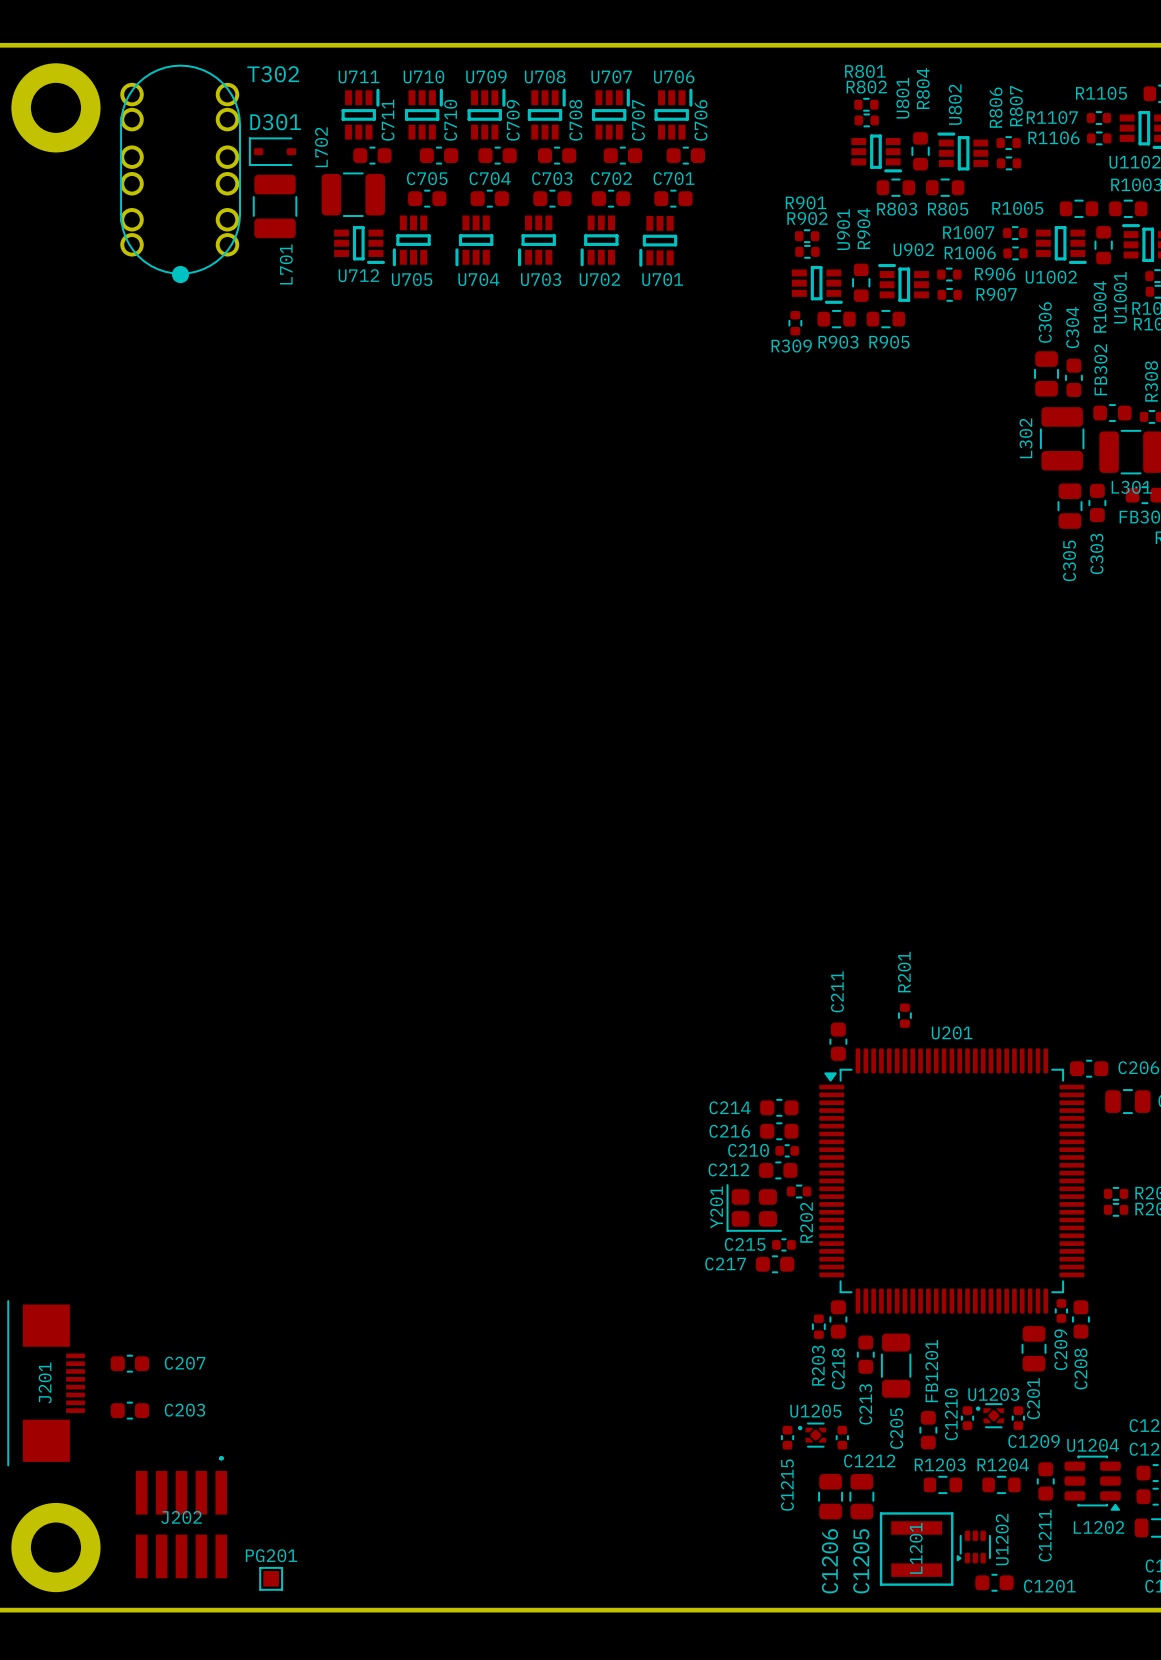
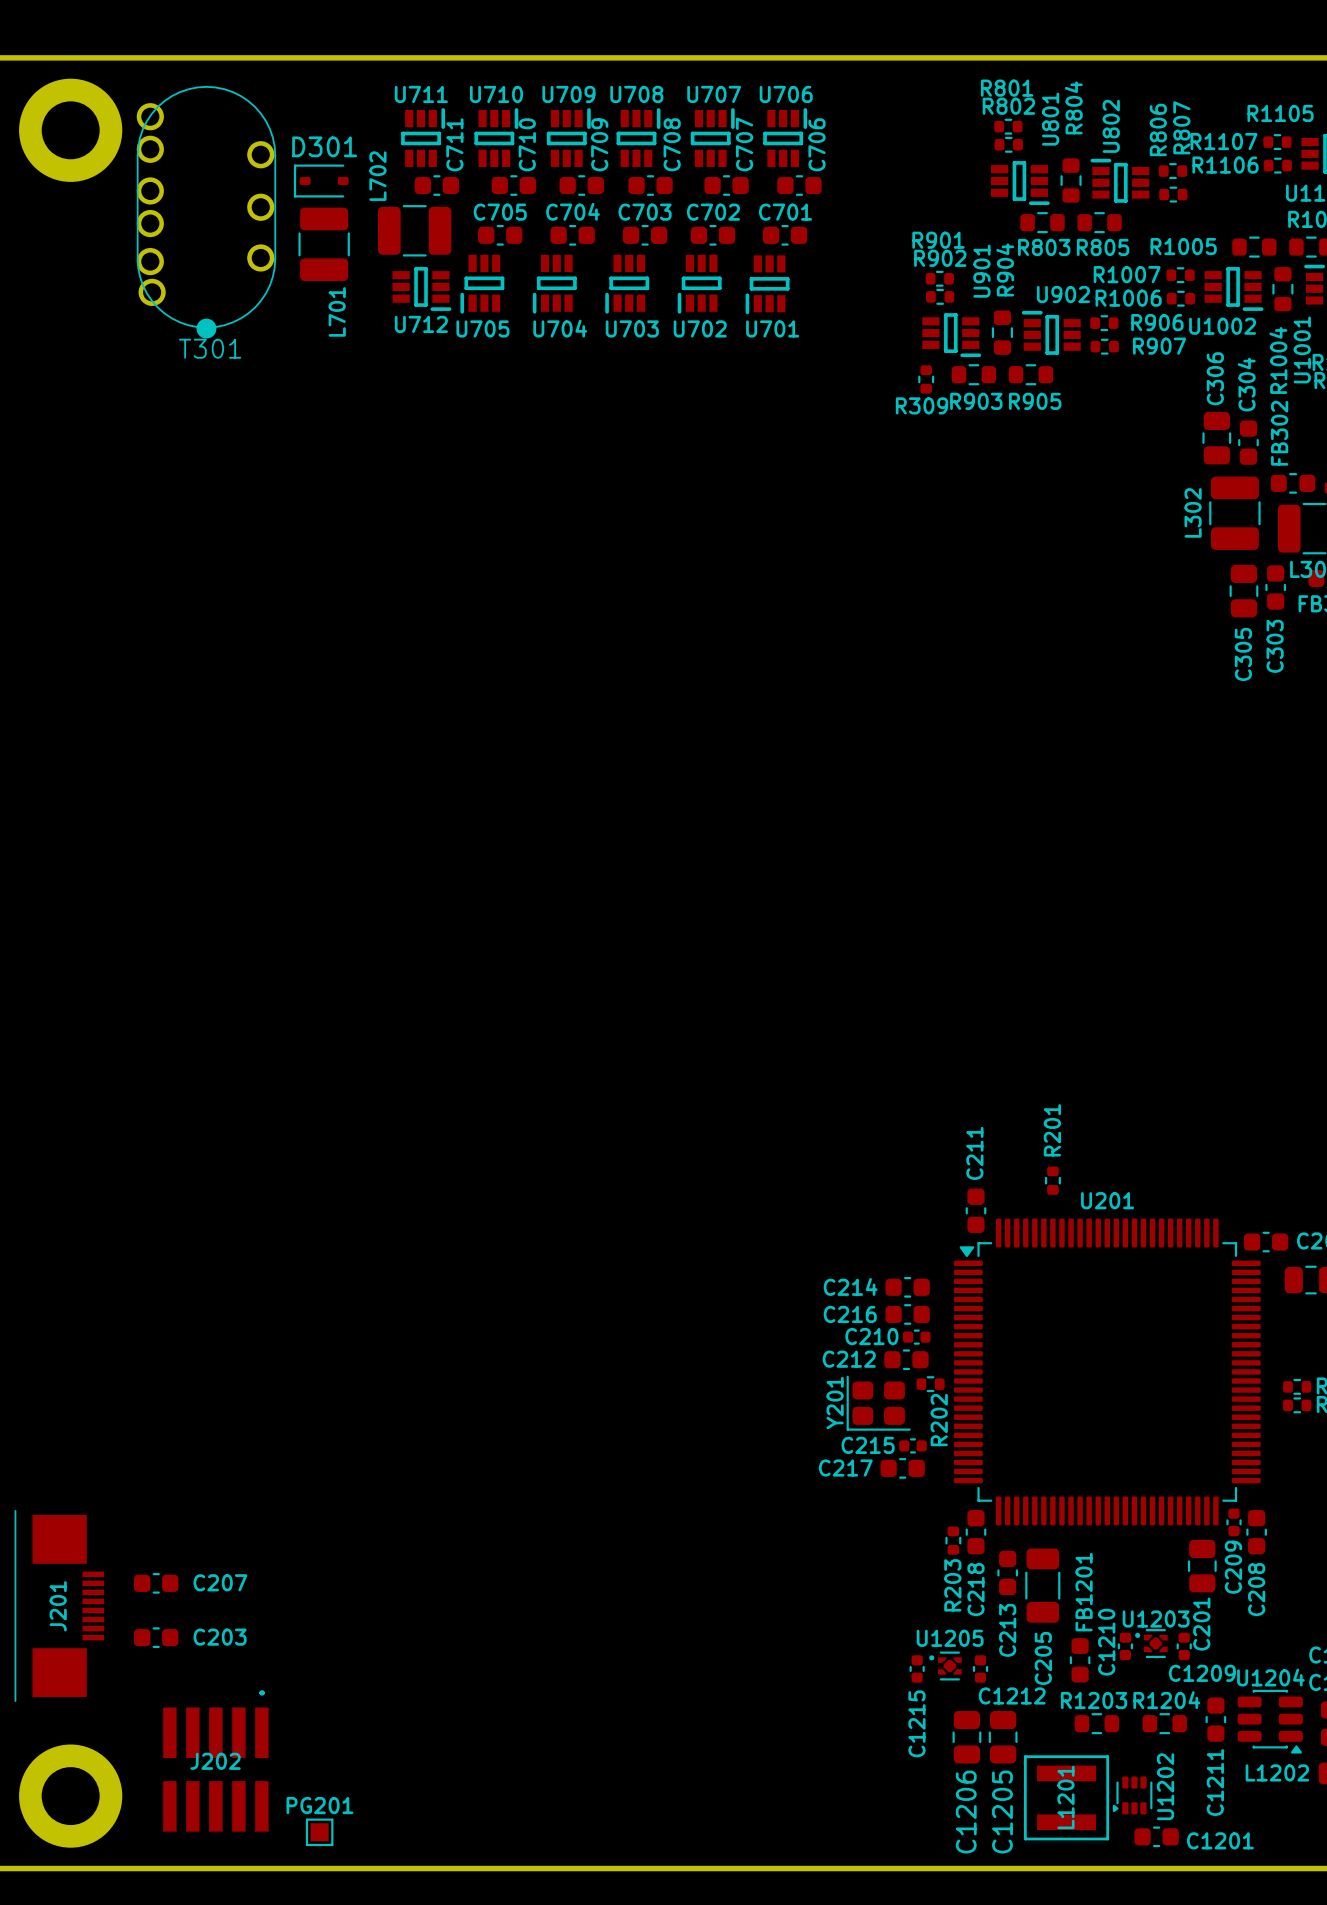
T302: (180, 173) -> none
T301: none -> (206, 212)

